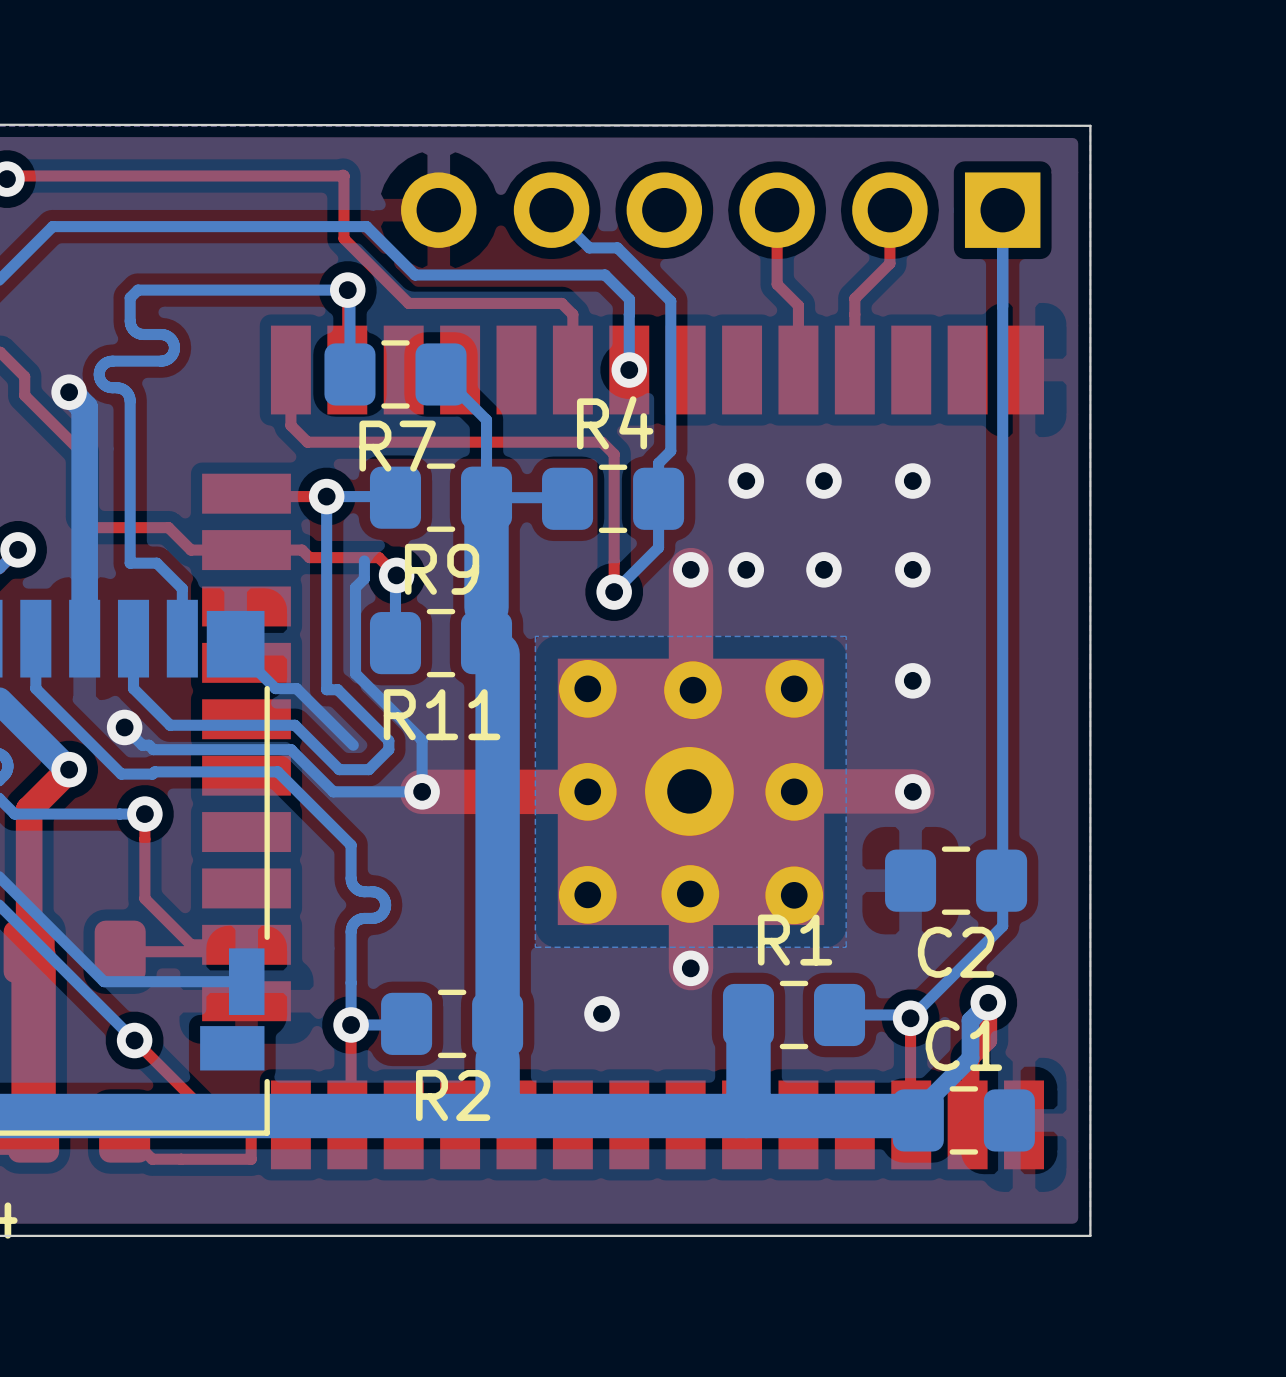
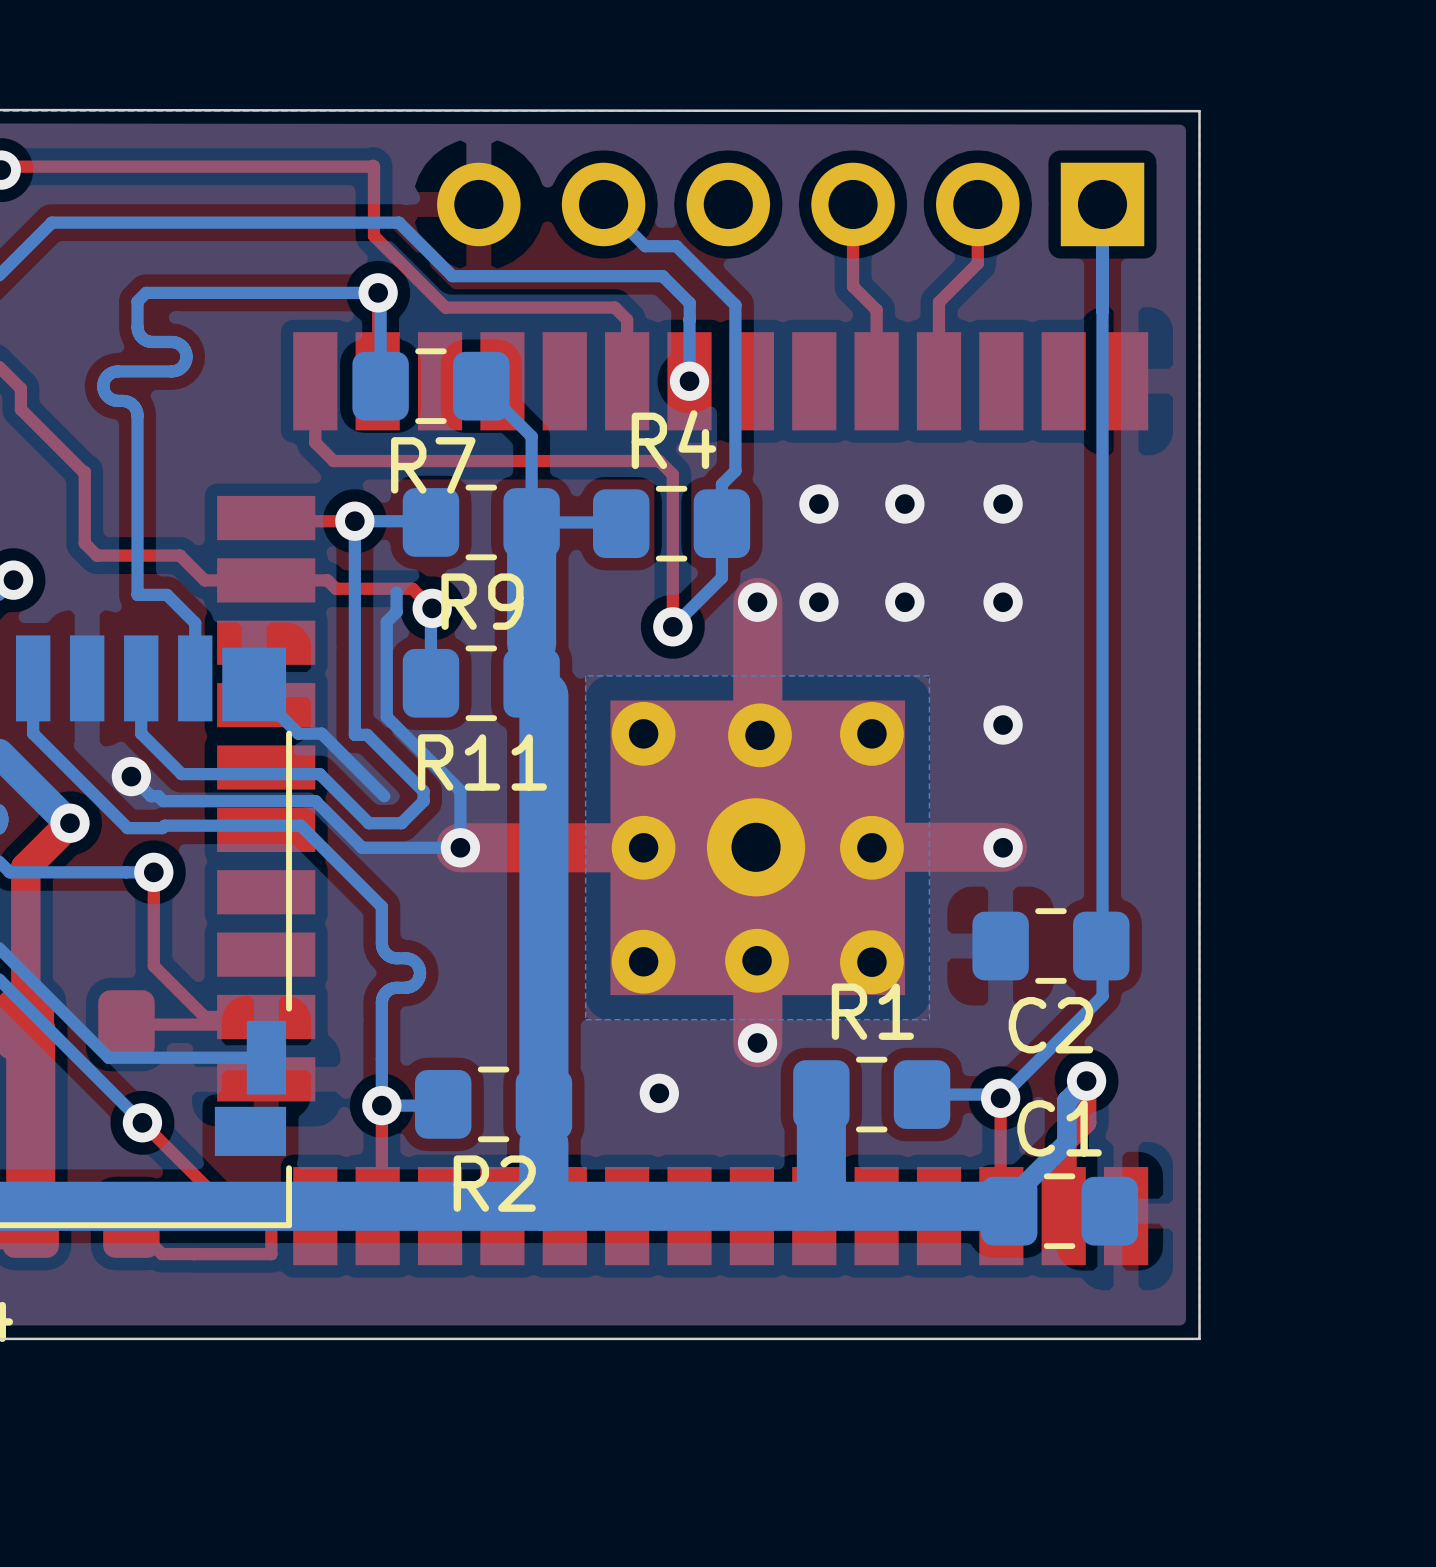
bottom track: (69, 392) (84, 407) (84, 638) -> none
via: (69, 392) -> none

